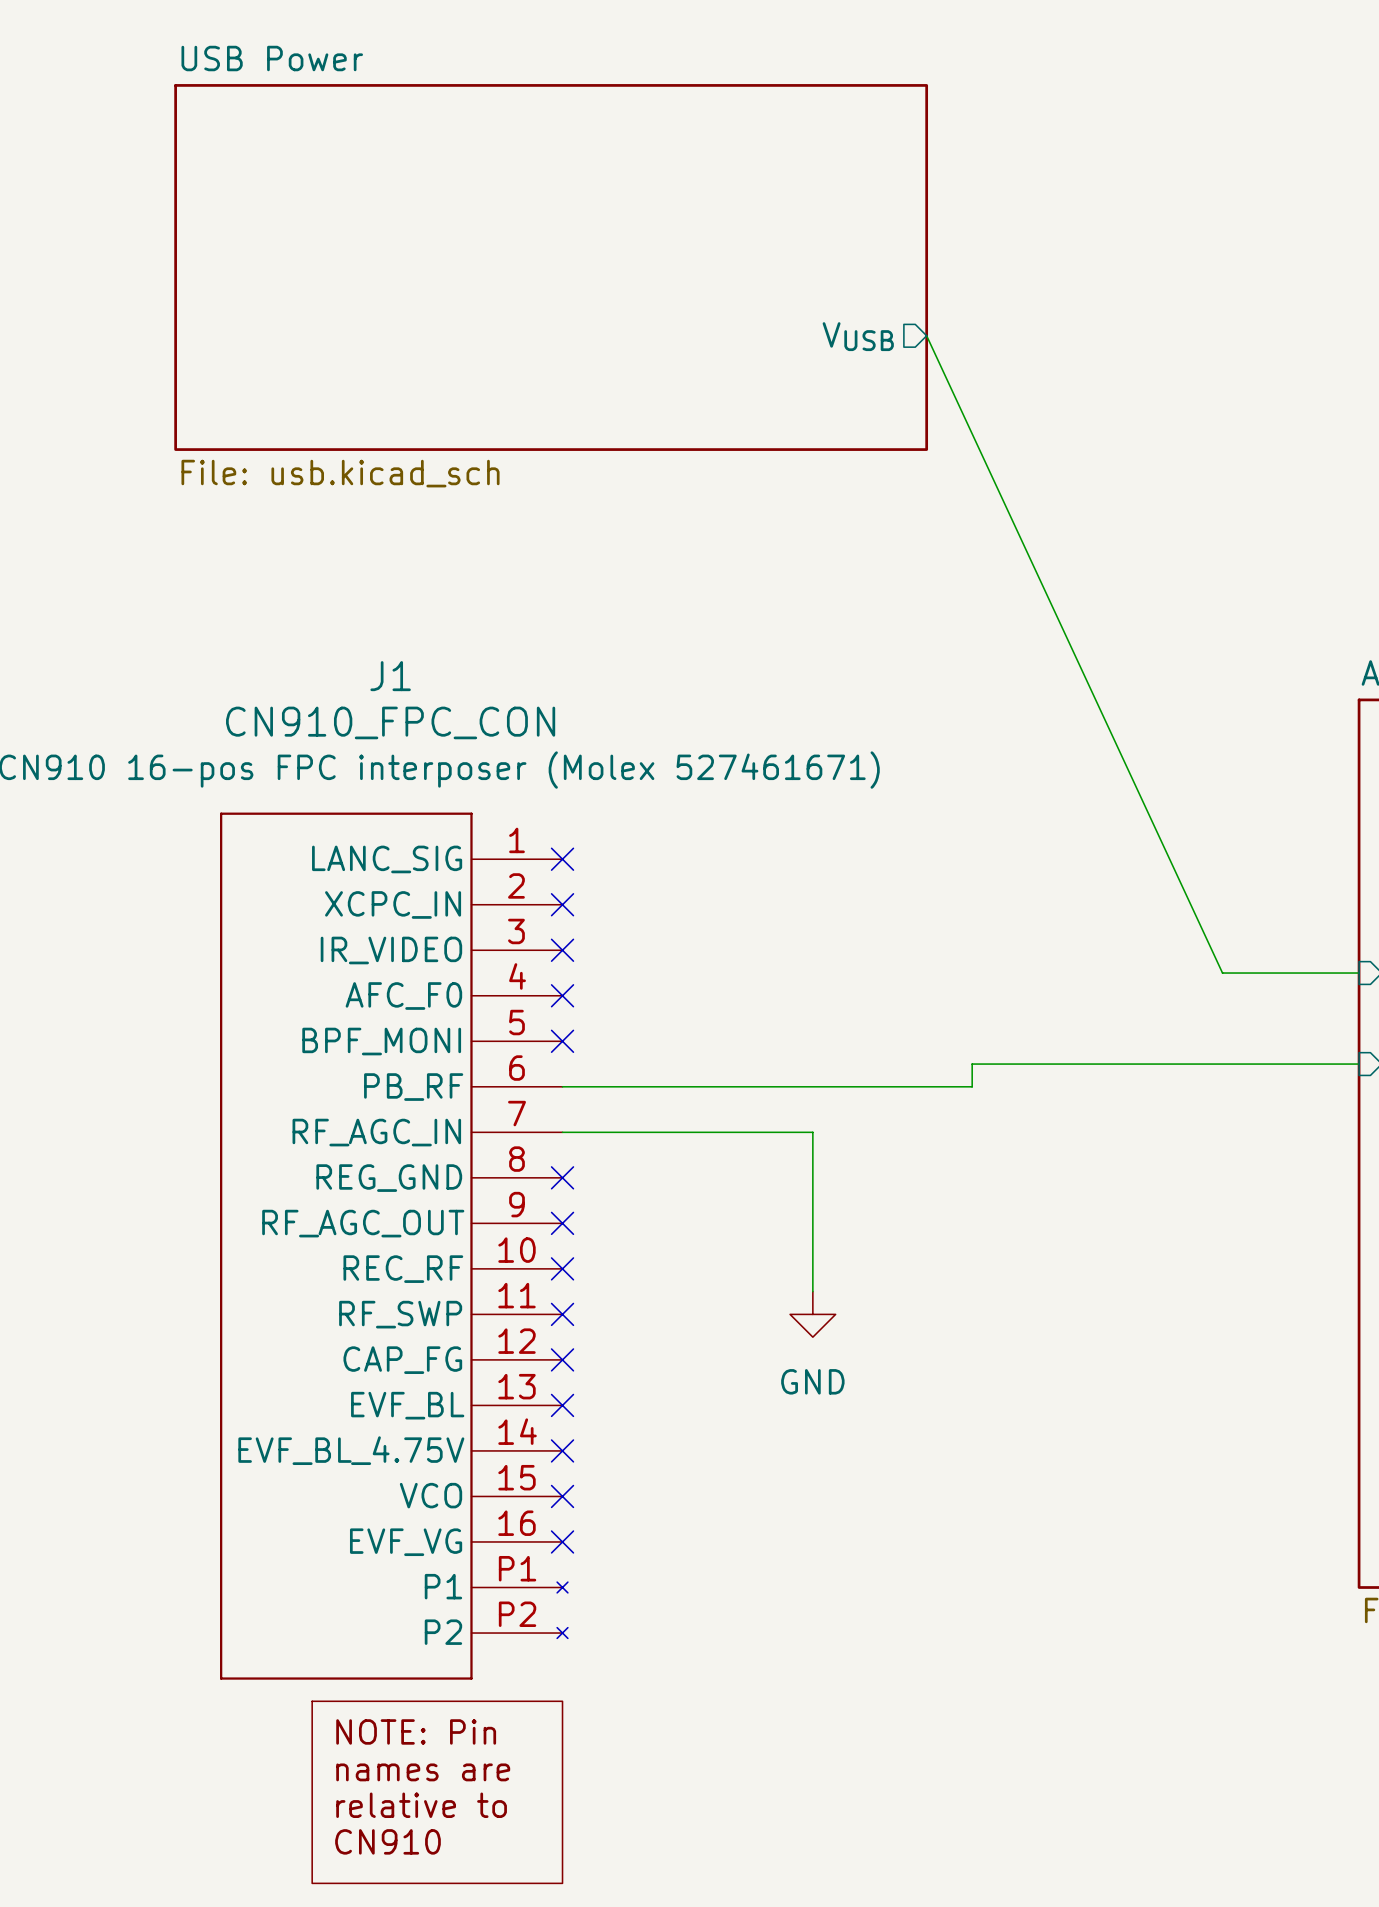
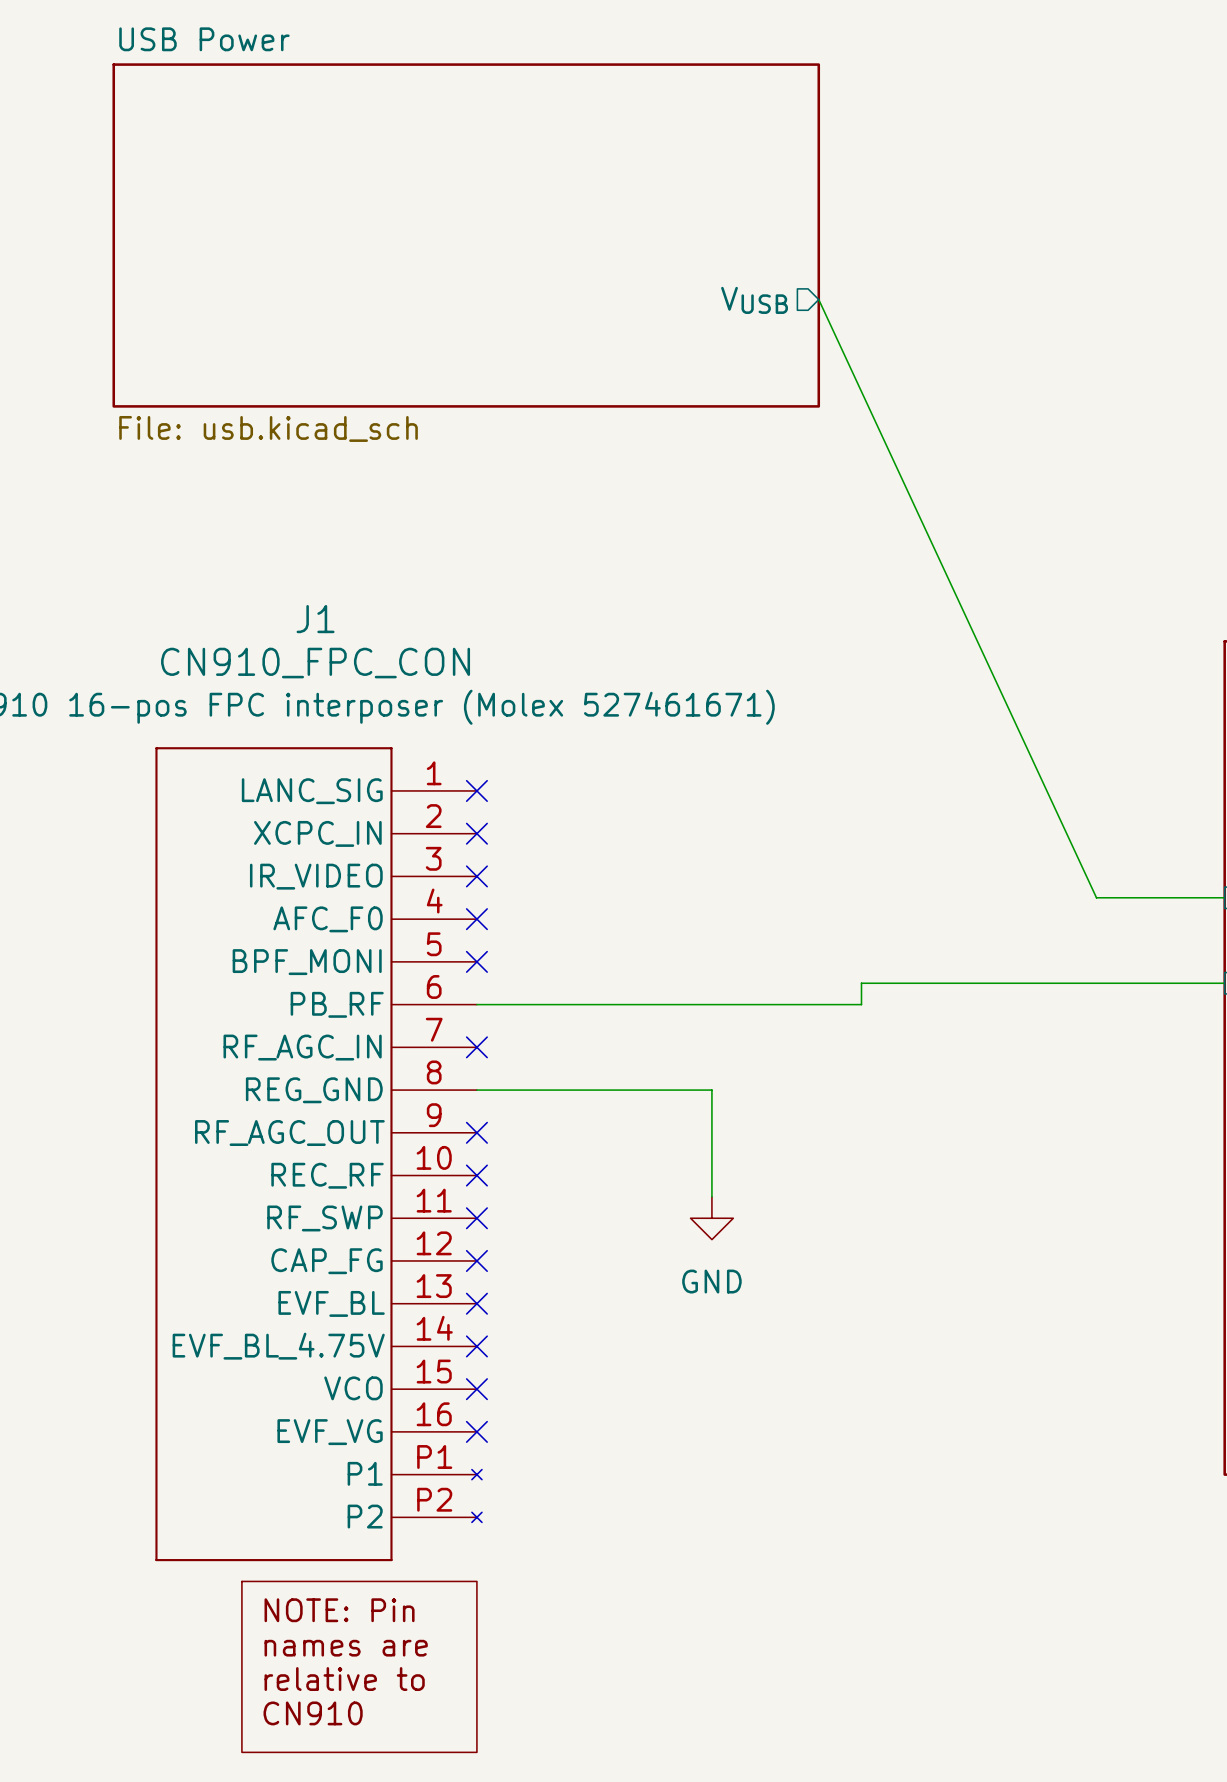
wire: (562, 1132) (812, 1132) (812, 1177) -> (476, 1090) (711, 1090)
no-connect mark position: (562, 1177) -> (476, 1047)

